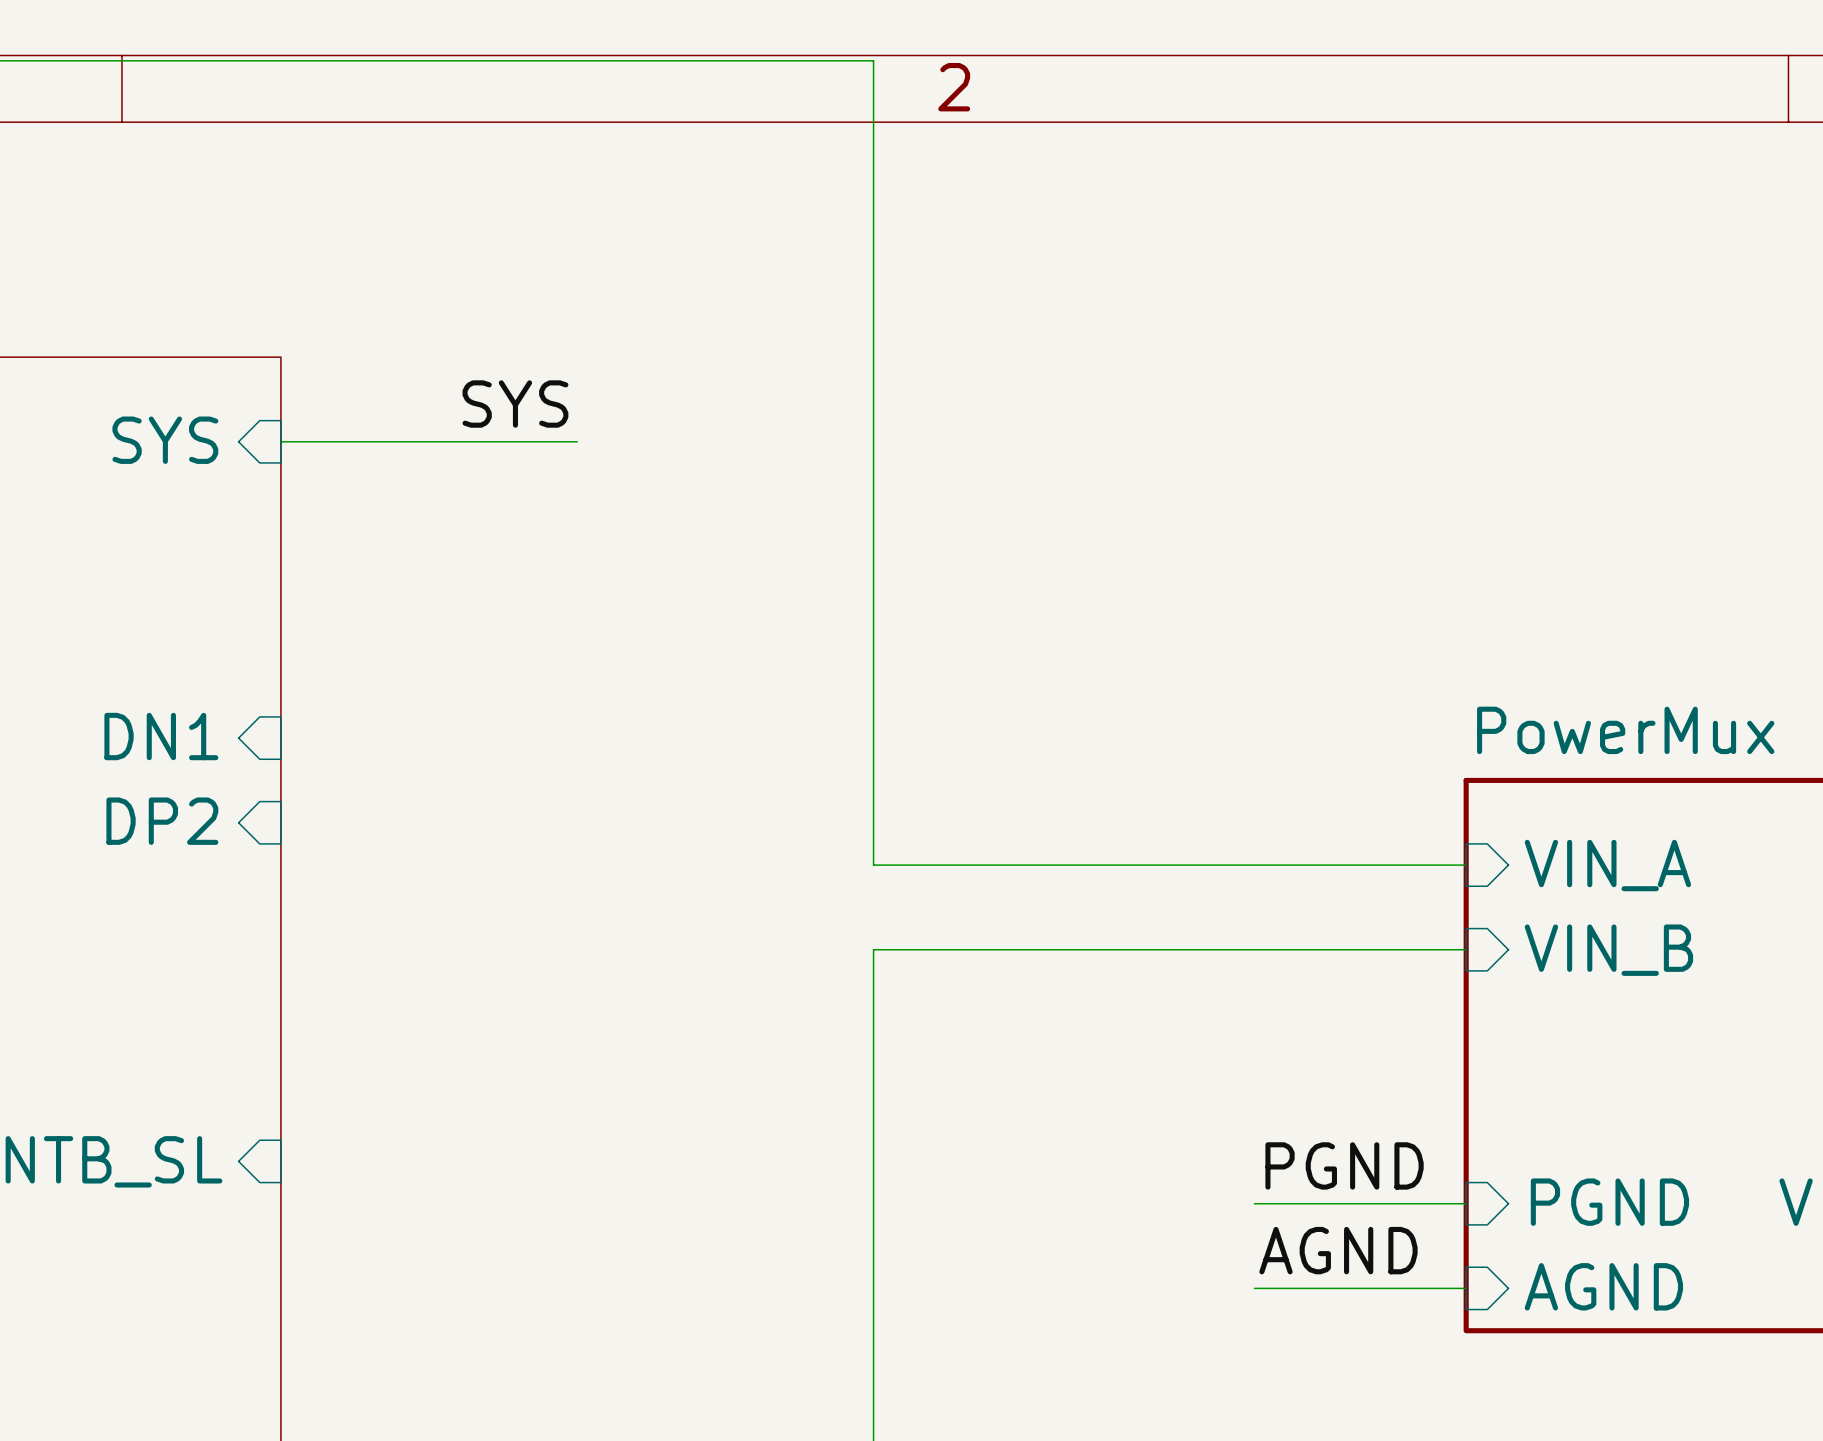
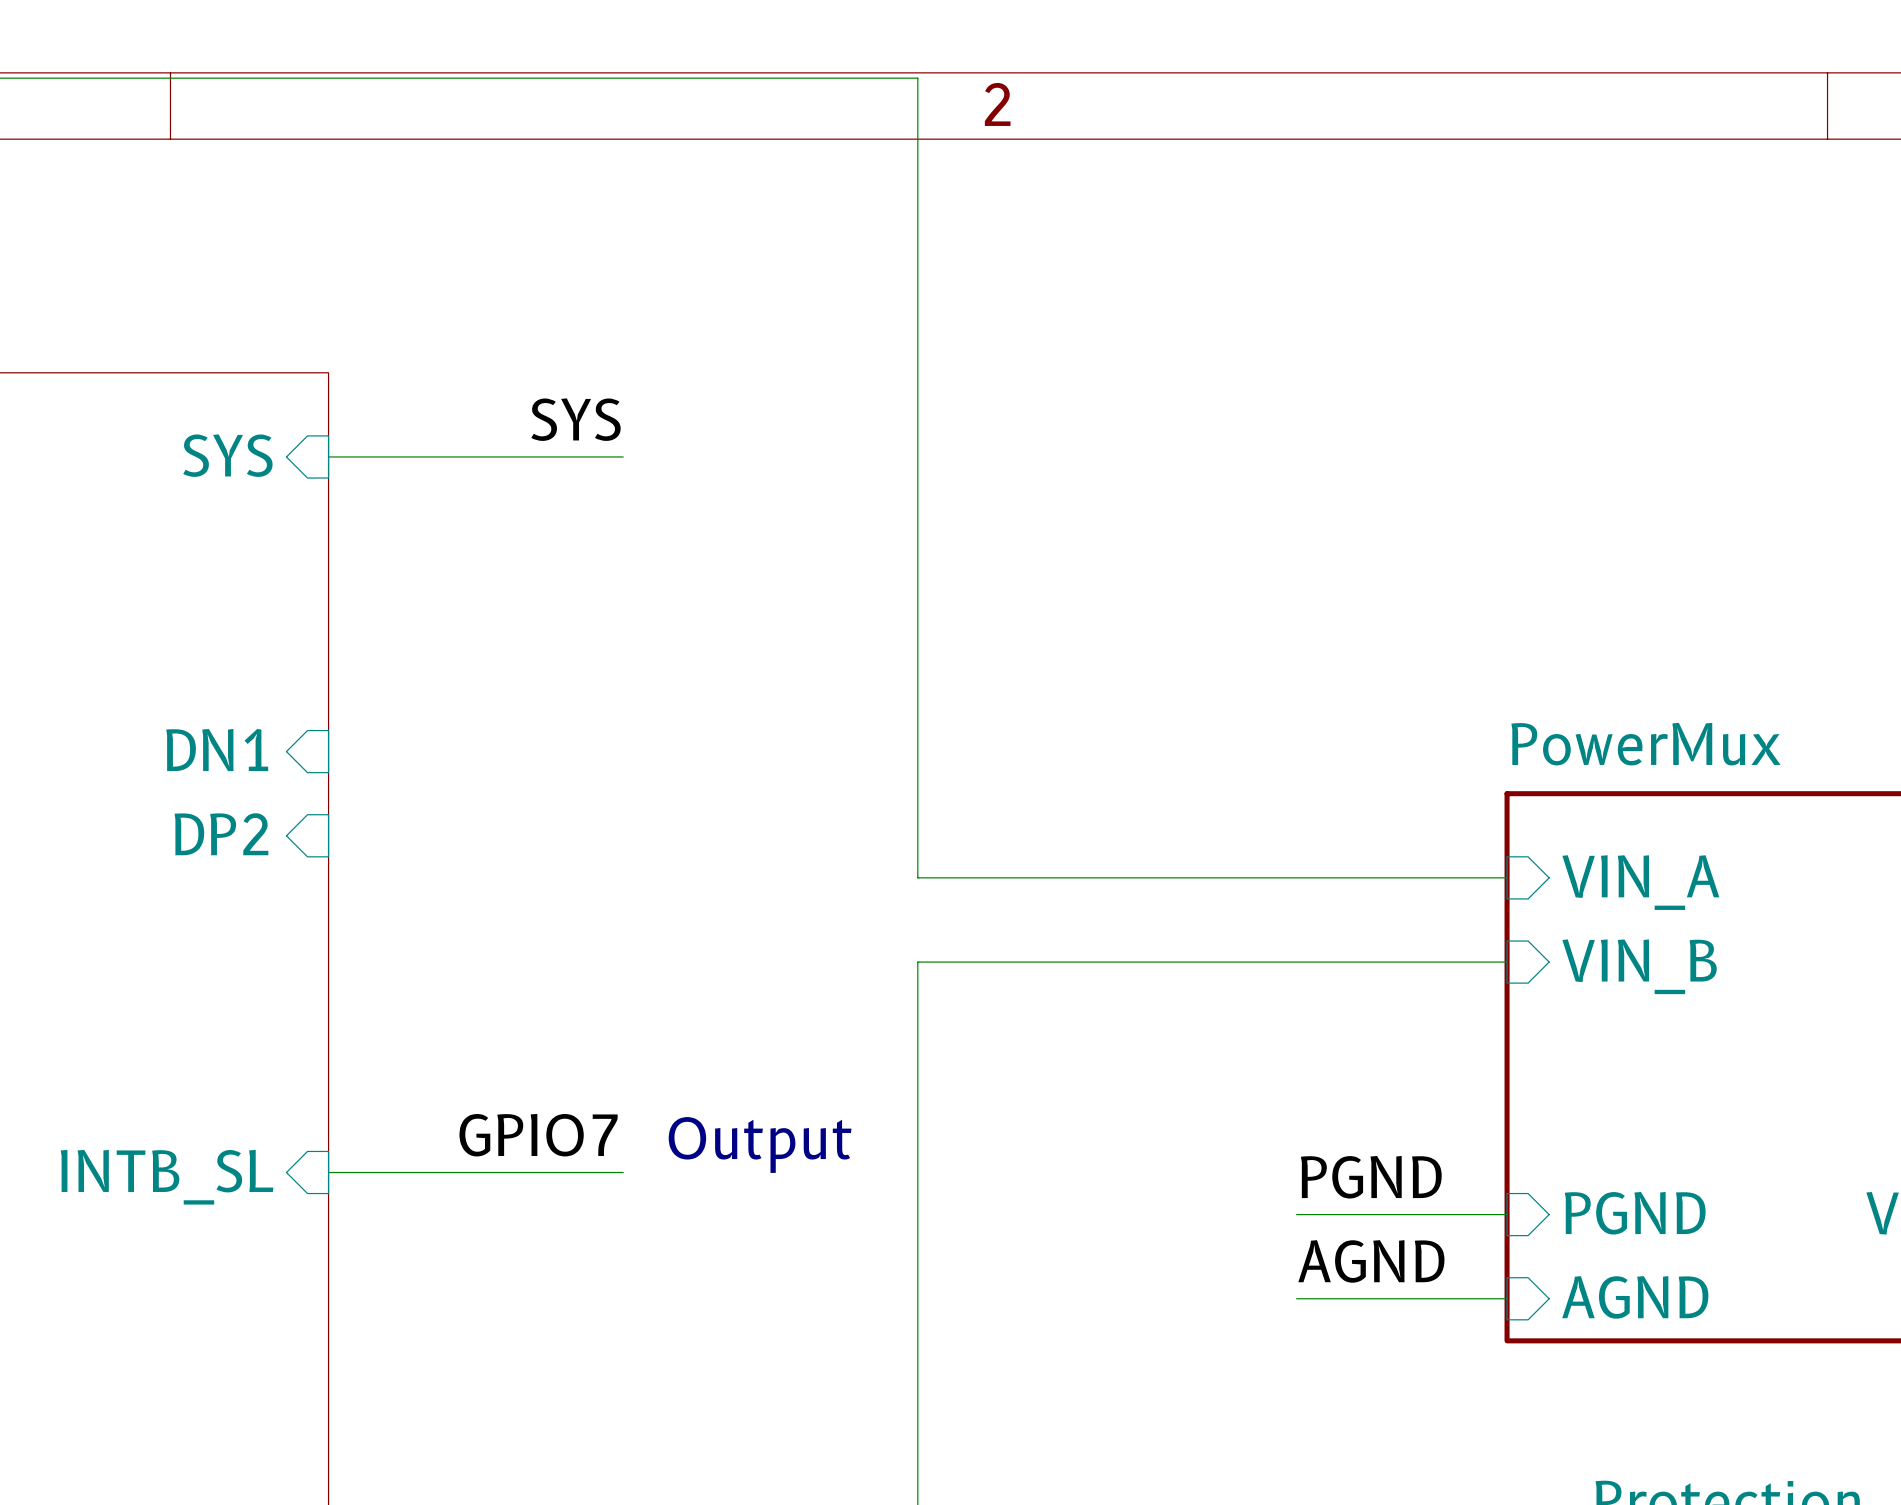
label: none -> GPIO7 (538, 1135)
text: none -> Output (760, 1144)
wire: none -> (328, 1172) (623, 1172)

